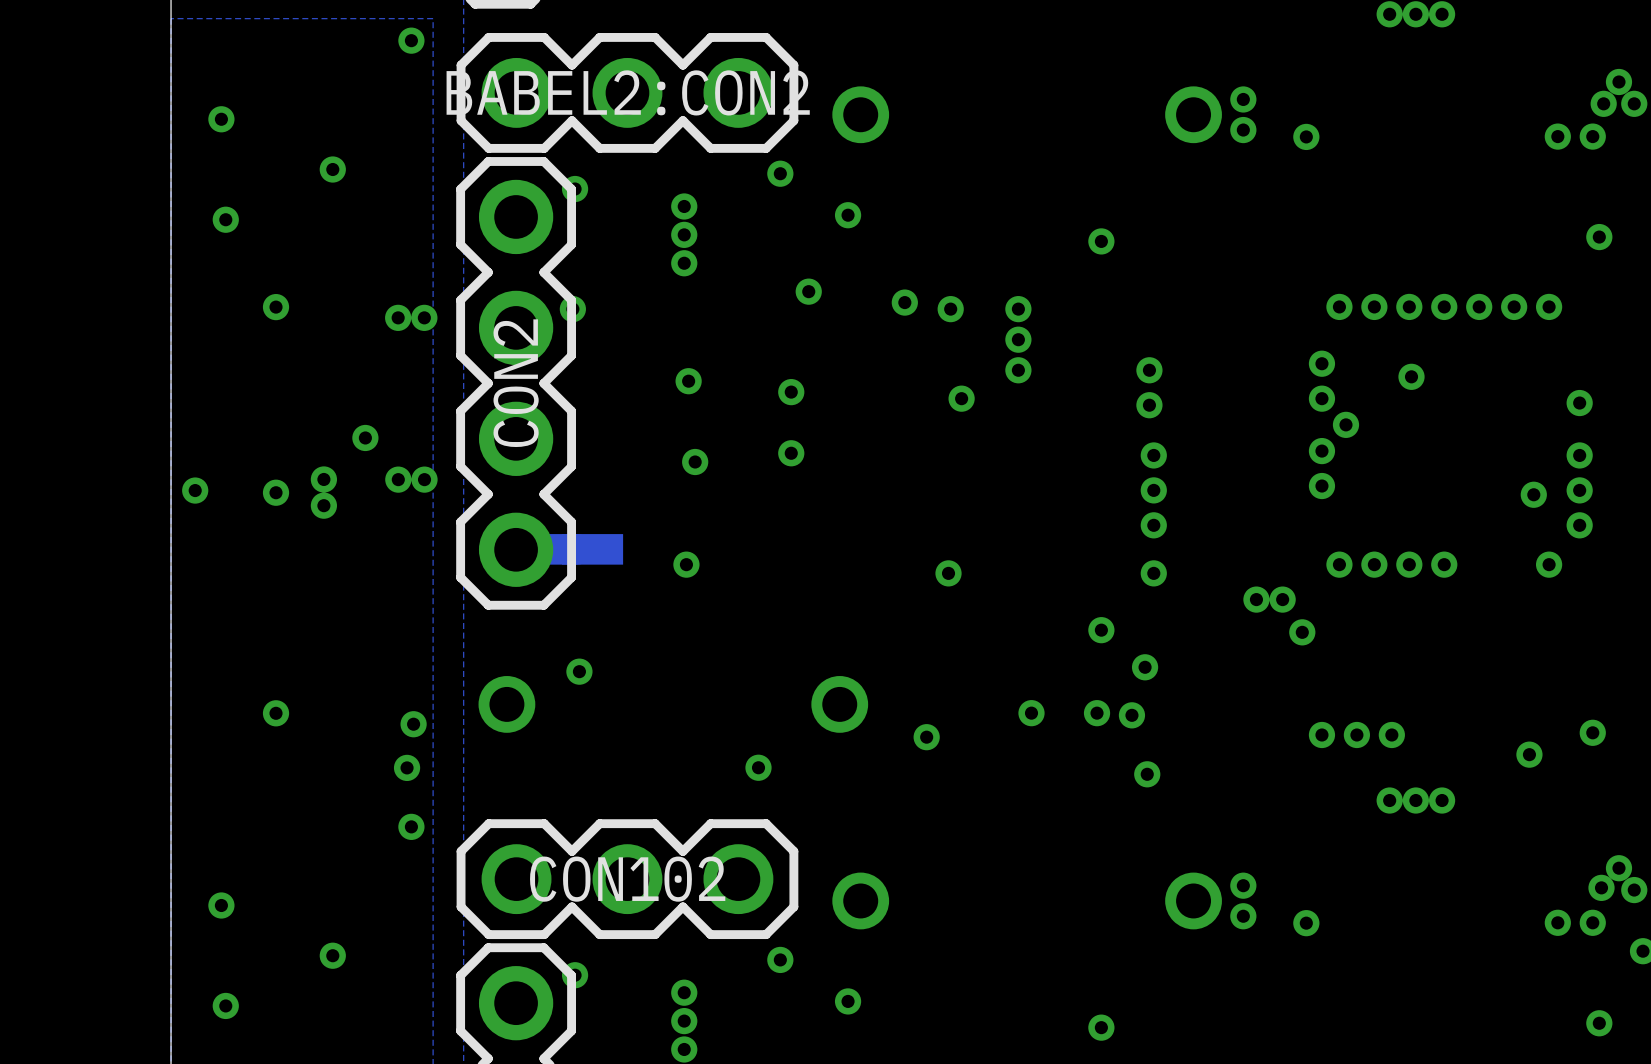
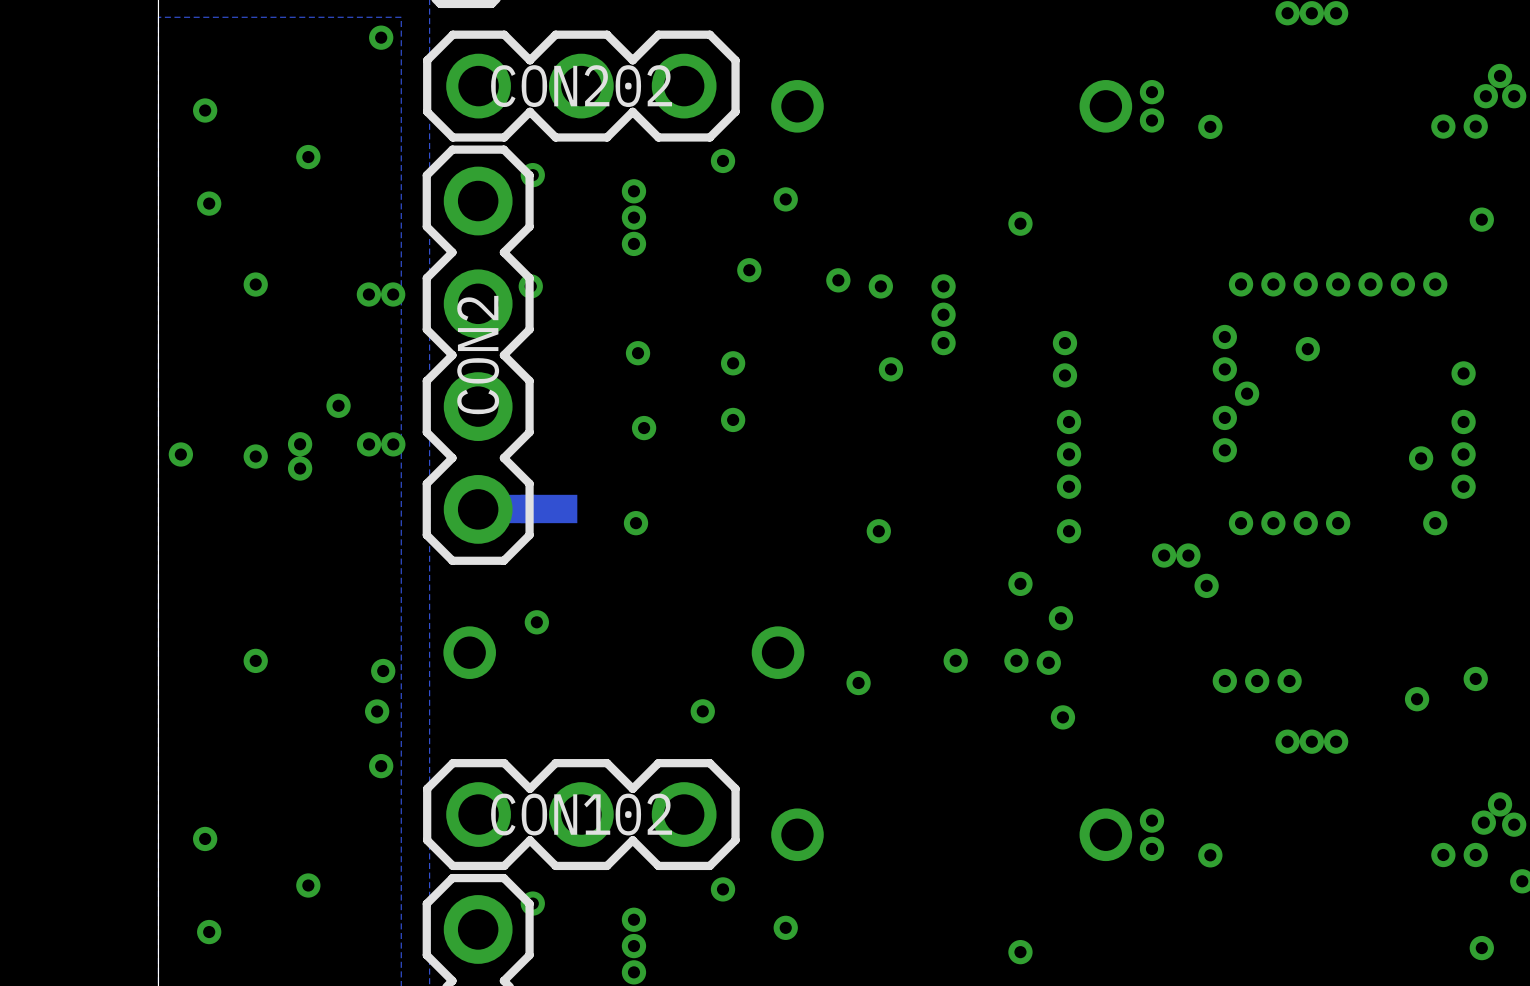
CON202 name: BABEL2:CON2 (628, 92) -> CON202 (581, 86)

